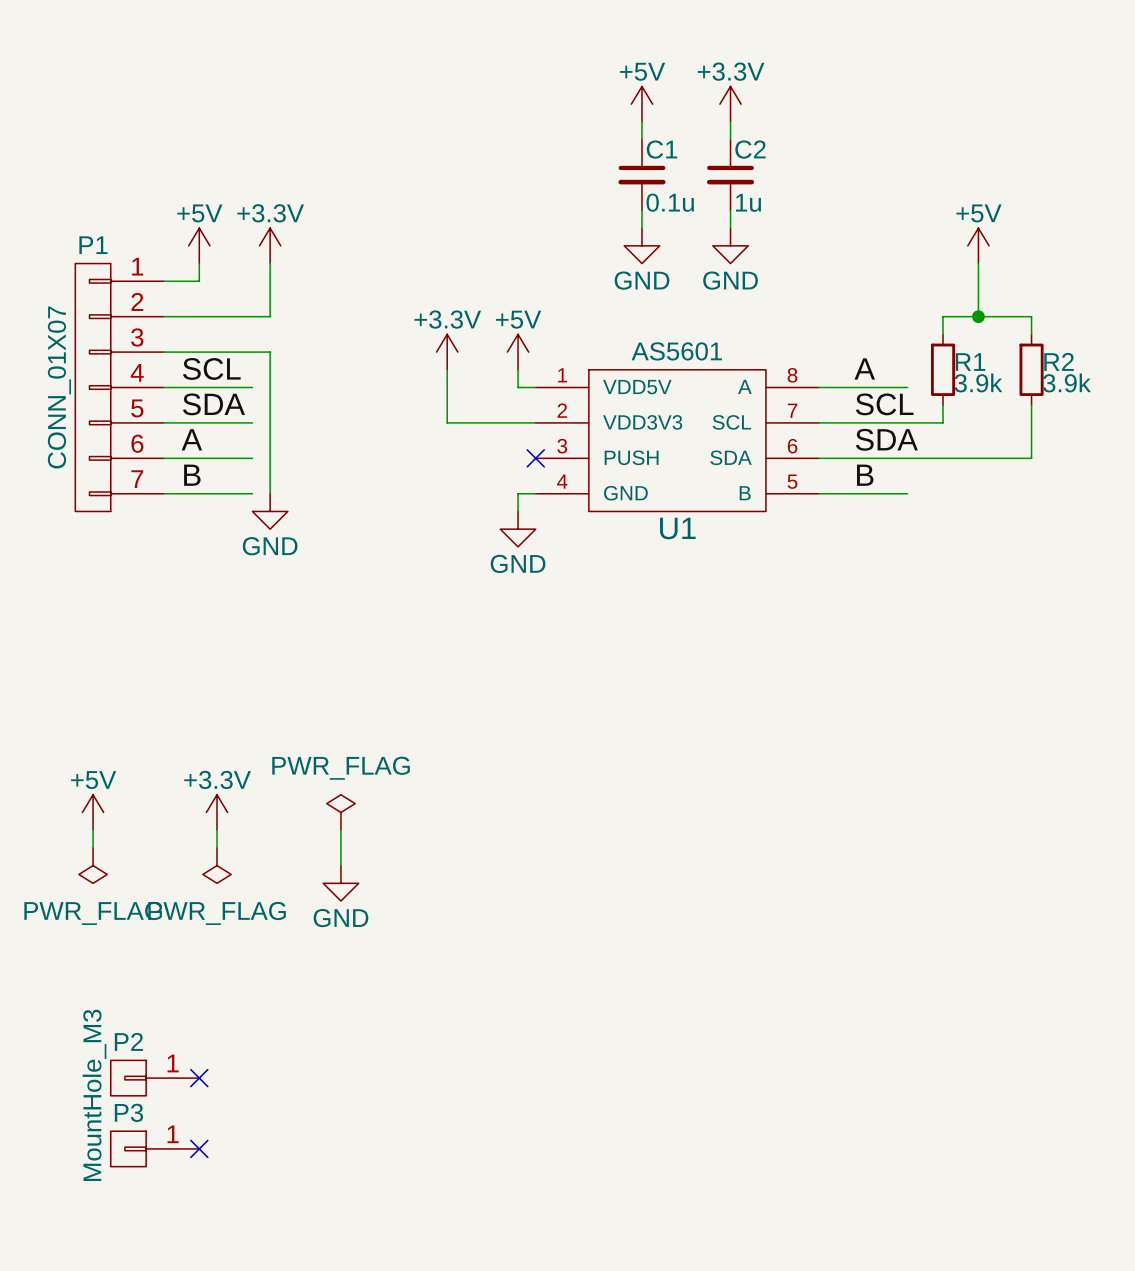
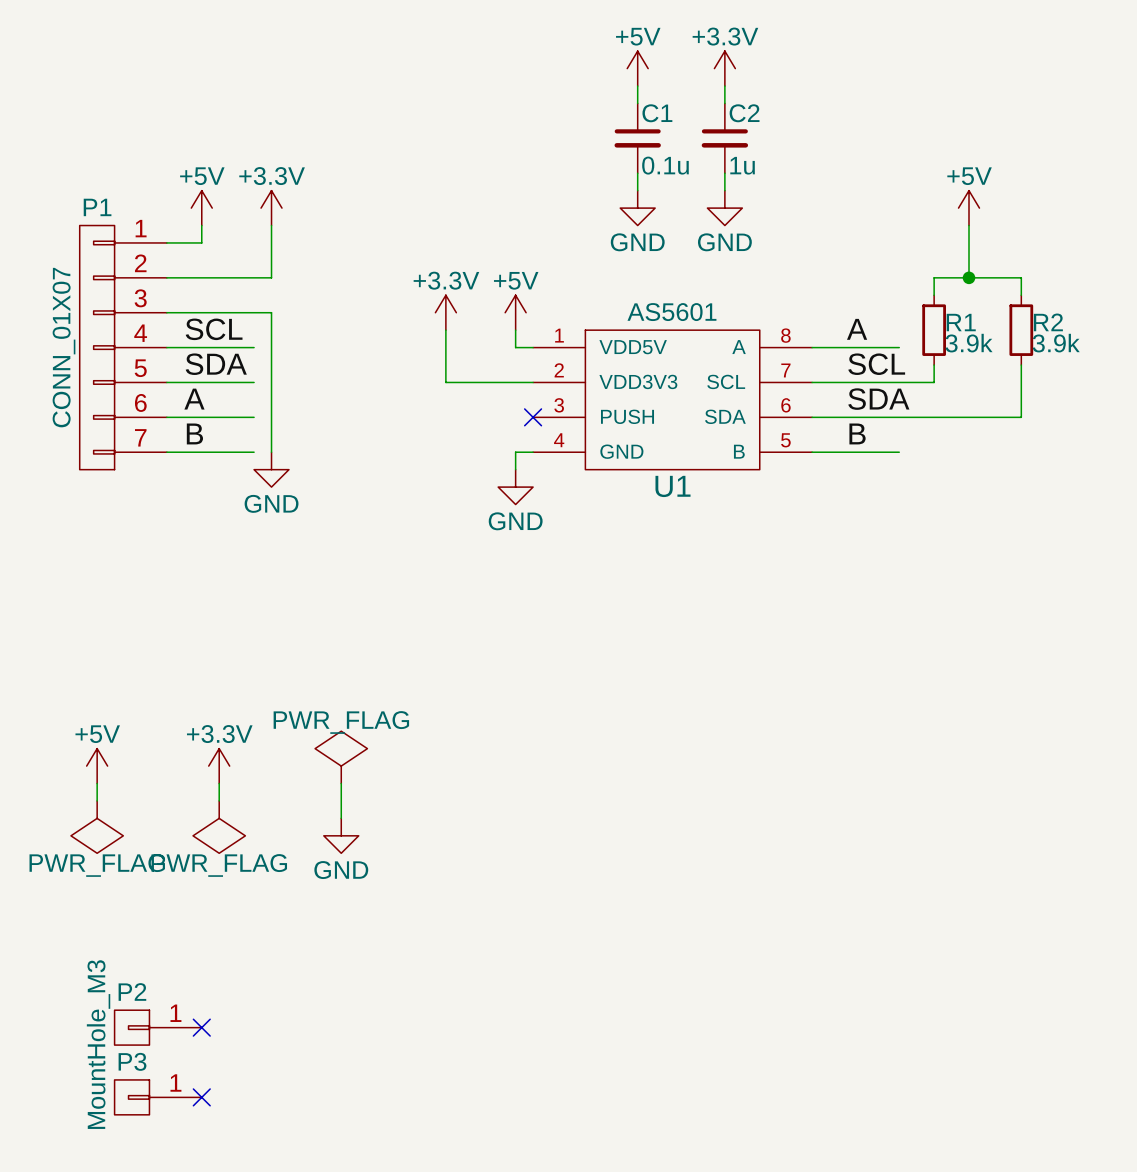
power symbol shape: [326, 794, 356, 831] -> [315, 731, 368, 784]
power symbol shape: [78, 847, 108, 884] -> [70, 800, 124, 854]
power symbol shape: [202, 847, 232, 884] -> [193, 800, 246, 854]

